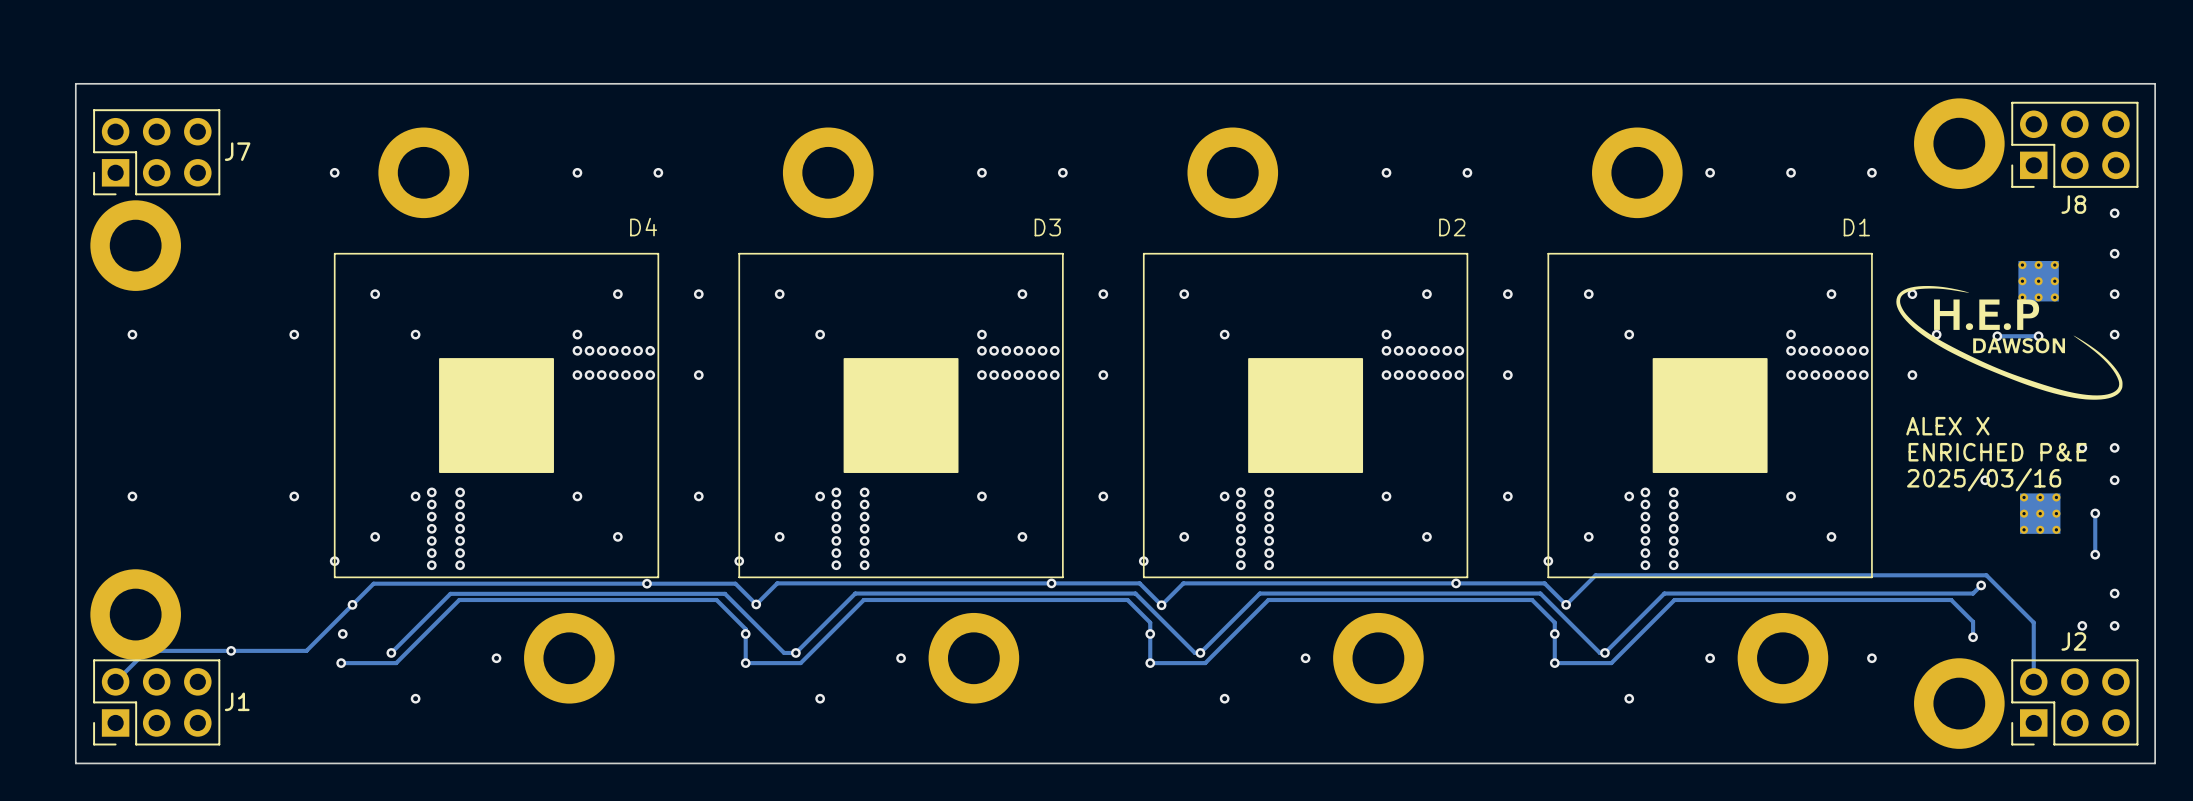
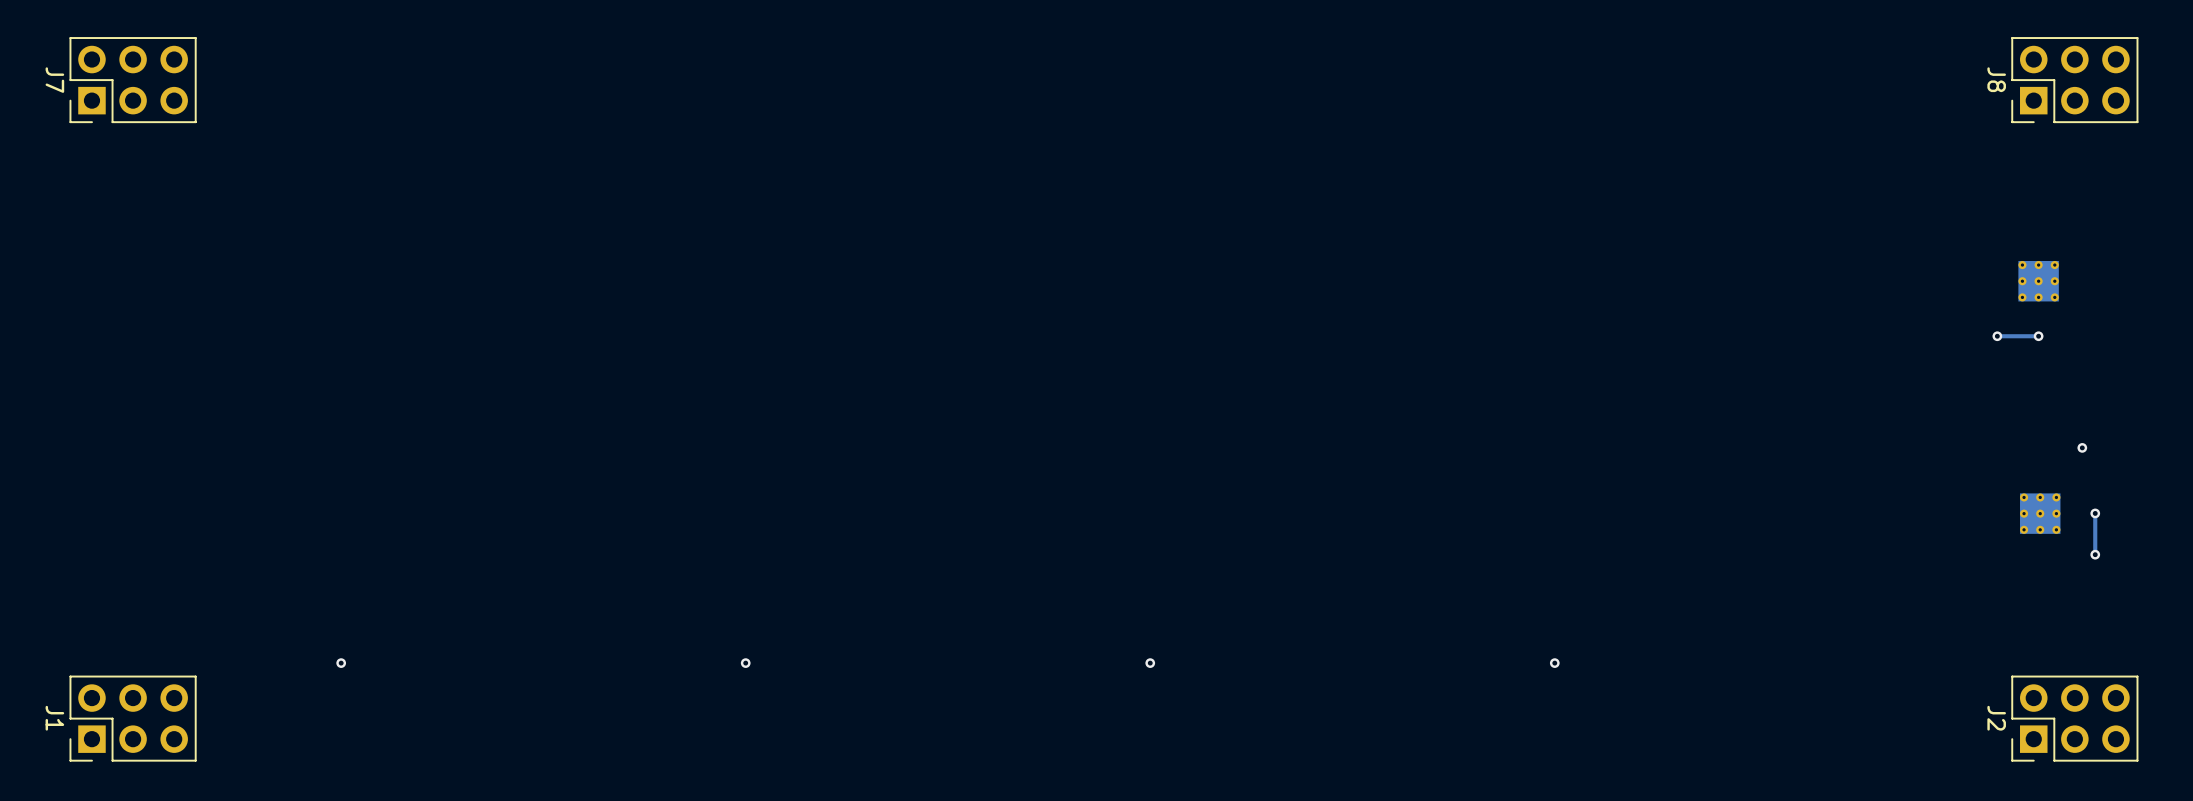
board edge: (2155, 83) (75, 83) (75, 763) (2155, 763) (2155, 83) -> none
part: (1959, 143) -> none
J8 position: (2074, 144) -> (2074, 80)
J7 name rotation: 0° (237, 151) -> 90° clockwise (54, 80)
J7 name position: J7 (237, 151) -> J7 (54, 80)
J7 position: (156, 152) -> (133, 80)
via: (334, 172) -> none
part: (423, 172) -> none
via: (577, 172) -> none
via: (658, 172) -> none
part: (828, 172) -> none
via: (981, 172) -> none
via: (1062, 172) -> none
part: (1232, 172) -> none
via: (1386, 172) -> none
via: (1467, 172) -> none
part: (1637, 172) -> none
via: (1710, 172) -> none
via: (1791, 172) -> none
via: (1871, 172) -> none
J8 name rotation: 0° (2073, 204) -> 90° clockwise (1996, 79)
J8 name position: J8 (2073, 204) -> J8 (1996, 79)
via: (2114, 213) -> none
text: D4 (643, 227) -> none
text: D3 (1047, 227) -> none
text: D2 (1452, 227) -> none
text: D1 (1856, 227) -> none
part: (135, 245) -> none
line: (658, 253) (334, 253) (334, 577) (658, 577) (658, 253) -> none
line: (1062, 253) (739, 253) (739, 577) (1062, 577) (1062, 253) -> none
line: (1467, 253) (1143, 253) (1143, 577) (1467, 577) (1467, 253) -> none
line: (1871, 253) (1548, 253) (1548, 577) (1871, 577) (1871, 253) -> none
via: (2114, 253) -> none
drawing: [1896, 285, 2123, 400] -> none
via: (375, 294) -> none
via: (617, 294) -> none
via: (698, 294) -> none
via: (779, 294) -> none
via: (1022, 294) -> none
via: (1103, 294) -> none
via: (1184, 294) -> none
via: (1426, 294) -> none
via: (1507, 294) -> none
via: (1588, 294) -> none
via: (1831, 294) -> none
via: (1912, 294) -> none
via: (2114, 294) -> none
via: (132, 334) -> none
via: (294, 334) -> none
via: (415, 334) -> none
via: (577, 334) -> none
via: (820, 334) -> none
via: (981, 334) -> none
via: (1224, 334) -> none
via: (1386, 334) -> none
via: (1629, 334) -> none
via: (1791, 334) -> none
via: (1936, 334) -> none
via: (2114, 334) -> none
via: (577, 350) -> none
via: (589, 350) -> none
via: (601, 350) -> none
via: (613, 350) -> none
via: (625, 350) -> none
via: (638, 350) -> none
via: (650, 350) -> none
via: (981, 350) -> none
via: (994, 350) -> none
via: (1006, 350) -> none
via: (1018, 350) -> none
via: (1030, 350) -> none
via: (1042, 350) -> none
via: (1054, 350) -> none
via: (1386, 350) -> none
via: (1398, 350) -> none
via: (1410, 350) -> none
via: (1422, 350) -> none
via: (1435, 350) -> none
via: (1447, 350) -> none
via: (1459, 350) -> none
via: (1791, 350) -> none
via: (1803, 350) -> none
via: (1815, 350) -> none
via: (1827, 350) -> none
via: (1839, 350) -> none
via: (1851, 350) -> none
via: (1863, 350) -> none
drawing: [439, 358, 554, 473] -> none
drawing: [843, 358, 959, 473] -> none
drawing: [1248, 358, 1364, 473] -> none
drawing: [1652, 358, 1768, 473] -> none
via: (577, 375) -> none
via: (589, 375) -> none
via: (601, 375) -> none
via: (613, 375) -> none
via: (625, 375) -> none
via: (638, 375) -> none
via: (650, 375) -> none
via: (698, 375) -> none
via: (981, 375) -> none
via: (994, 375) -> none
via: (1006, 375) -> none
via: (1018, 375) -> none
via: (1030, 375) -> none
via: (1042, 375) -> none
via: (1054, 375) -> none
via: (1103, 375) -> none
via: (1386, 375) -> none
via: (1398, 375) -> none
via: (1410, 375) -> none
via: (1422, 375) -> none
via: (1435, 375) -> none
via: (1447, 375) -> none
via: (1459, 375) -> none
via: (1507, 375) -> none
via: (1791, 375) -> none
via: (1803, 375) -> none
via: (1815, 375) -> none
via: (1827, 375) -> none
via: (1839, 375) -> none
via: (1851, 375) -> none
via: (1863, 375) -> none
via: (1912, 375) -> none
text: ALEX X (1947, 426) -> none
via: (2114, 447) -> none
text: ENRICHED P&E (1997, 452) -> none
text: 2025/03/16 (1984, 479) -> none
via: (1985, 480) -> none
via: (2114, 480) -> none
via: (431, 492) -> none
via: (460, 492) -> none
via: (836, 492) -> none
via: (864, 492) -> none
via: (1240, 492) -> none
via: (1269, 492) -> none
via: (1645, 492) -> none
via: (1673, 492) -> none
via: (132, 496) -> none
via: (294, 496) -> none
via: (415, 496) -> none
via: (577, 496) -> none
via: (698, 496) -> none
via: (820, 496) -> none
via: (981, 496) -> none
via: (1103, 496) -> none
via: (1224, 496) -> none
via: (1386, 496) -> none
via: (1507, 496) -> none
via: (1629, 496) -> none
via: (1791, 496) -> none
via: (431, 504) -> none
via: (460, 504) -> none
via: (836, 504) -> none
via: (864, 504) -> none
via: (1240, 504) -> none
via: (1269, 504) -> none
via: (1645, 504) -> none
via: (1673, 504) -> none
via: (431, 516) -> none
via: (460, 516) -> none
via: (836, 516) -> none
via: (864, 516) -> none
via: (1240, 516) -> none
via: (1269, 516) -> none
via: (1645, 516) -> none
via: (1673, 516) -> none
via: (431, 528) -> none
via: (460, 528) -> none
via: (836, 528) -> none
via: (864, 528) -> none
via: (1240, 528) -> none
via: (1269, 528) -> none
via: (1645, 528) -> none
via: (1673, 528) -> none
via: (375, 536) -> none
via: (617, 536) -> none
via: (779, 536) -> none
via: (1022, 536) -> none
via: (1184, 536) -> none
via: (1426, 536) -> none
via: (1588, 536) -> none
via: (1831, 536) -> none
via: (431, 540) -> none
via: (460, 540) -> none
via: (836, 540) -> none
via: (864, 540) -> none
via: (1240, 540) -> none
via: (1269, 540) -> none
via: (1645, 540) -> none
via: (1673, 540) -> none
via: (431, 553) -> none
via: (460, 553) -> none
via: (836, 553) -> none
via: (864, 553) -> none
via: (1240, 553) -> none
via: (1269, 553) -> none
via: (1645, 553) -> none
via: (1673, 553) -> none
via: (334, 561) -> none
via: (739, 561) -> none
via: (1143, 561) -> none
via: (1548, 561) -> none
via: (431, 565) -> none
via: (460, 565) -> none
via: (836, 565) -> none
via: (864, 565) -> none
via: (1240, 565) -> none
via: (1269, 565) -> none
via: (1645, 565) -> none
via: (1673, 565) -> none
via: (647, 583) -> none
via: (1051, 583) -> none
via: (1456, 583) -> none
track: (1981, 585) (1973, 593) (1664, 593) (1604, 652) (1599, 652) (1540, 593) (1259, 593) (1200, 652) (1194, 652) (1135, 593) (855, 593) (795, 652) (784, 652) (724, 593) (450, 593) (391, 652) -> none
via: (1981, 585) -> none
via: (2114, 593) -> none
via: (352, 604) -> none
via: (756, 604) -> none
track: (1566, 604) (1544, 583) (1183, 583) (1161, 605) (1139, 583) (777, 583) (756, 604) (735, 583) (373, 583) (306, 650) (146, 650) (115, 681) -> none
via: (1566, 604) -> none
via: (1161, 605) -> none
track: (1565, 605) (1595, 575) (1986, 575) (2033, 622) (2033, 681) -> none
part: (135, 614) -> none
via: (2082, 625) -> none
via: (2114, 625) -> none
via: (342, 633) -> none
via: (745, 633) -> none
via: (1150, 633) -> none
via: (1554, 633) -> none
track: (1973, 637) (1973, 621) (1951, 600) (1674, 600) (1611, 663) (1554, 663) (1554, 622) (1532, 600) (1268, 600) (1205, 663) (1150, 663) (1150, 622) (1127, 600) (863, 600) (800, 663) (745, 663) (745, 629) (716, 600) (459, 600) (396, 663) (341, 663) -> none
via: (1973, 637) -> none
J2 name rotation: 0° (2073, 641) -> 90° clockwise (1996, 718)
J2 name position: J2 (2073, 641) -> J2 (1996, 718)
via: (231, 650) -> none
via: (391, 652) -> none
via: (795, 652) -> none
via: (1200, 652) -> none
via: (1604, 652) -> none
via: (496, 658) -> none
part: (569, 658) -> none
via: (901, 658) -> none
part: (973, 658) -> none
via: (1305, 658) -> none
part: (1378, 658) -> none
via: (1710, 658) -> none
part: (1782, 658) -> none
via: (1871, 658) -> none
via: (415, 698) -> none
via: (820, 698) -> none
via: (1224, 698) -> none
via: (1629, 698) -> none
J1 name rotation: 0° (237, 701) -> 90° clockwise (54, 718)
J1 name position: J1 (237, 701) -> J1 (54, 718)
J1 position: (156, 702) -> (133, 718)
J2 position: (2074, 702) -> (2074, 718)
part: (1959, 703) -> none

